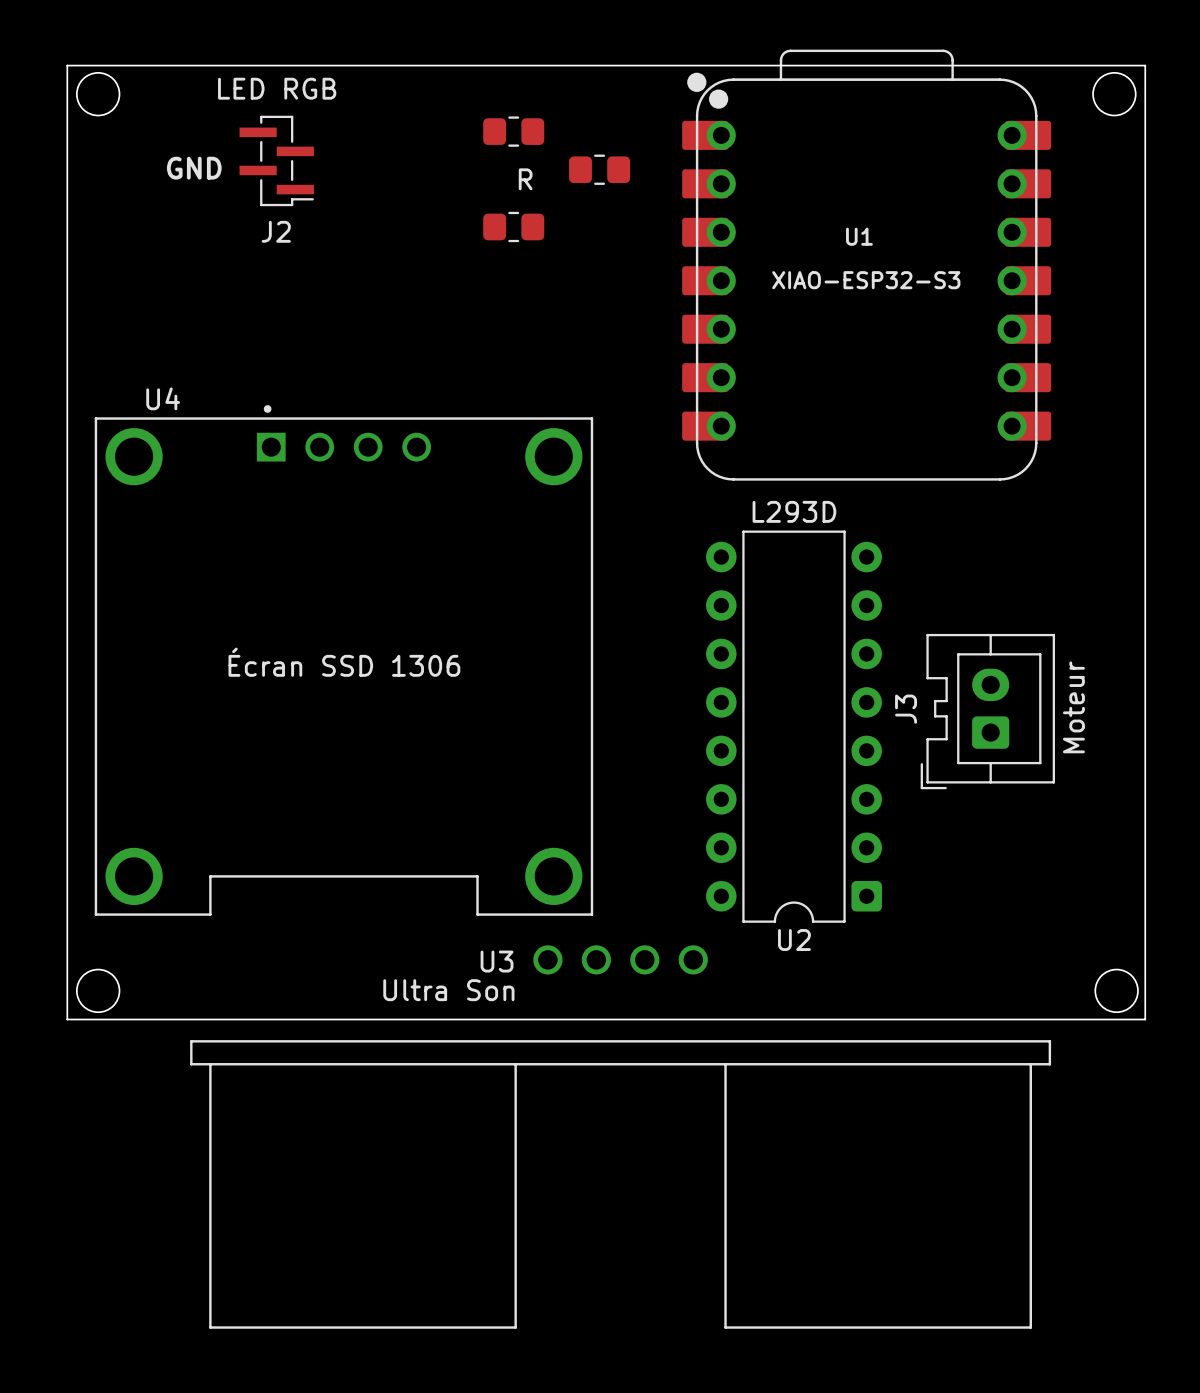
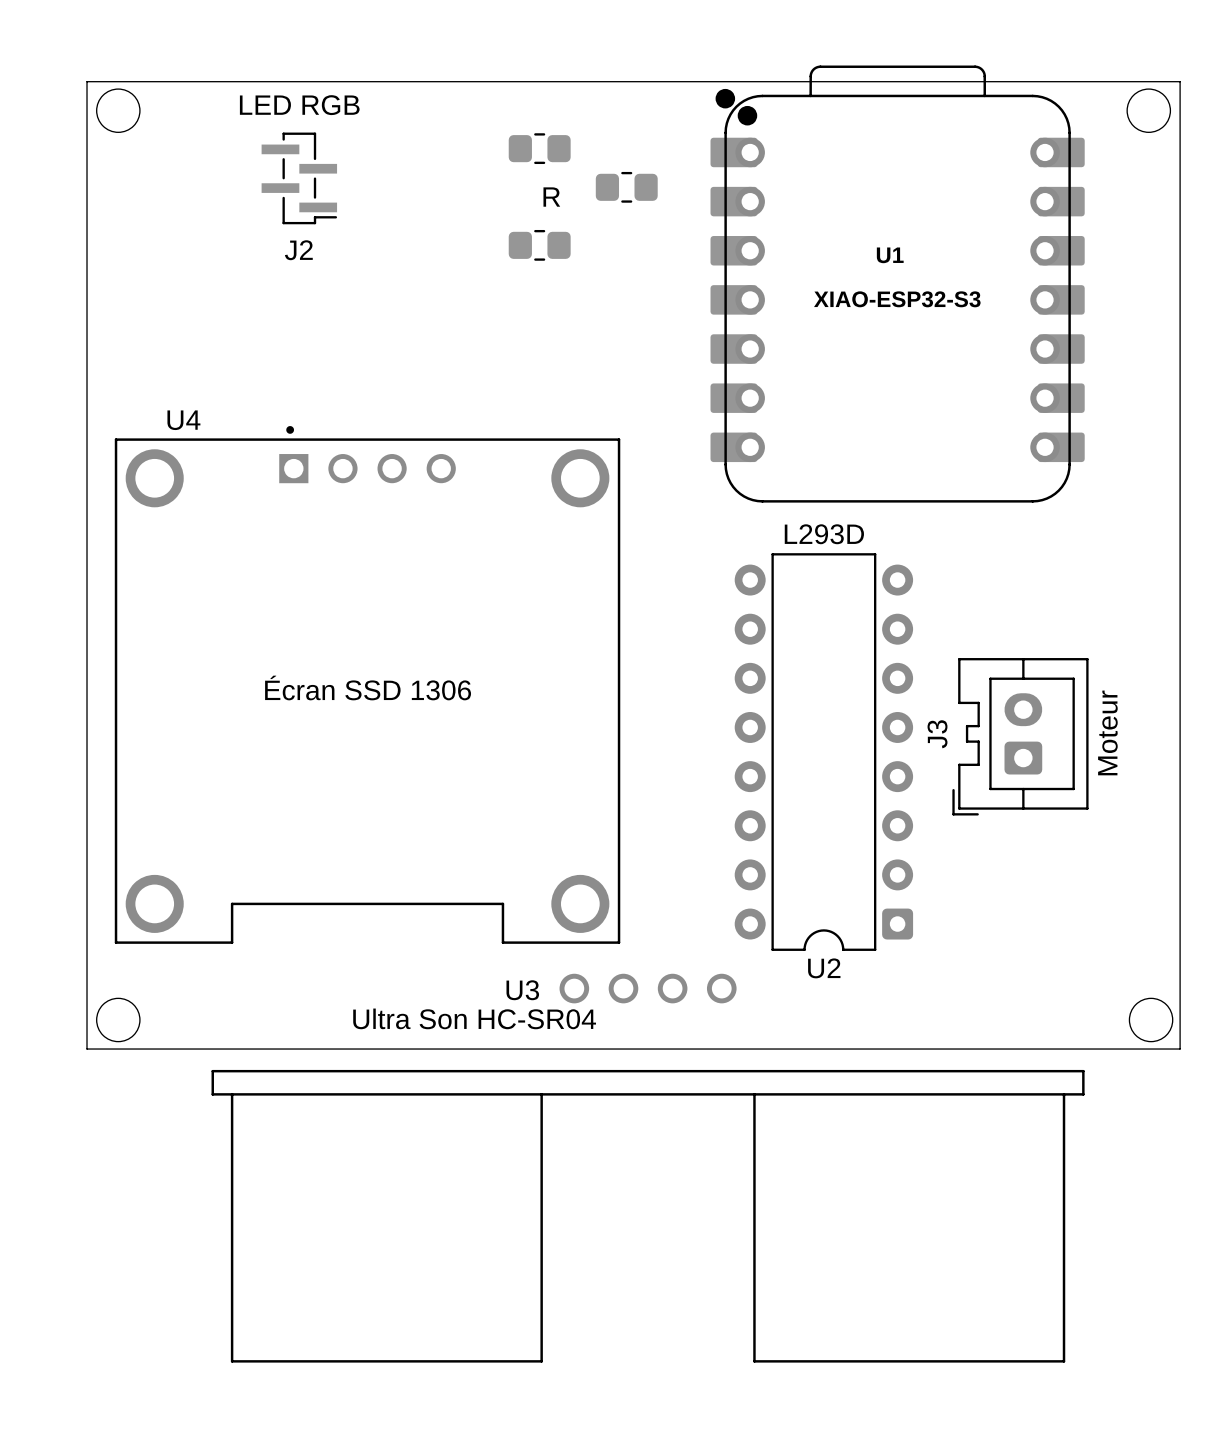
text: GND (194, 168) -> none
U3 value: Ultra Son (448, 990) -> Ultra Son HC-SR04 (474, 1018)

